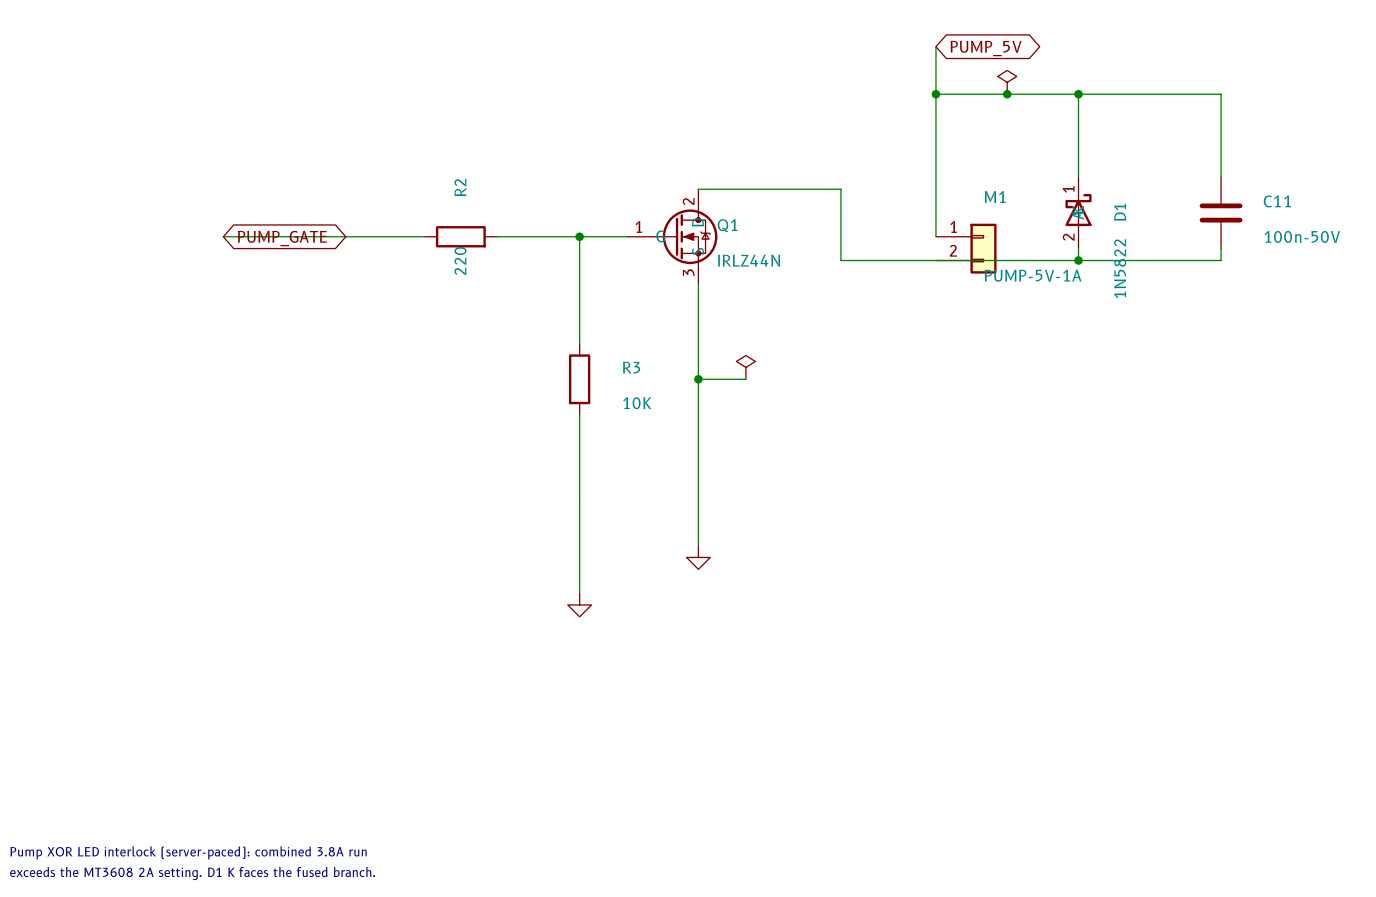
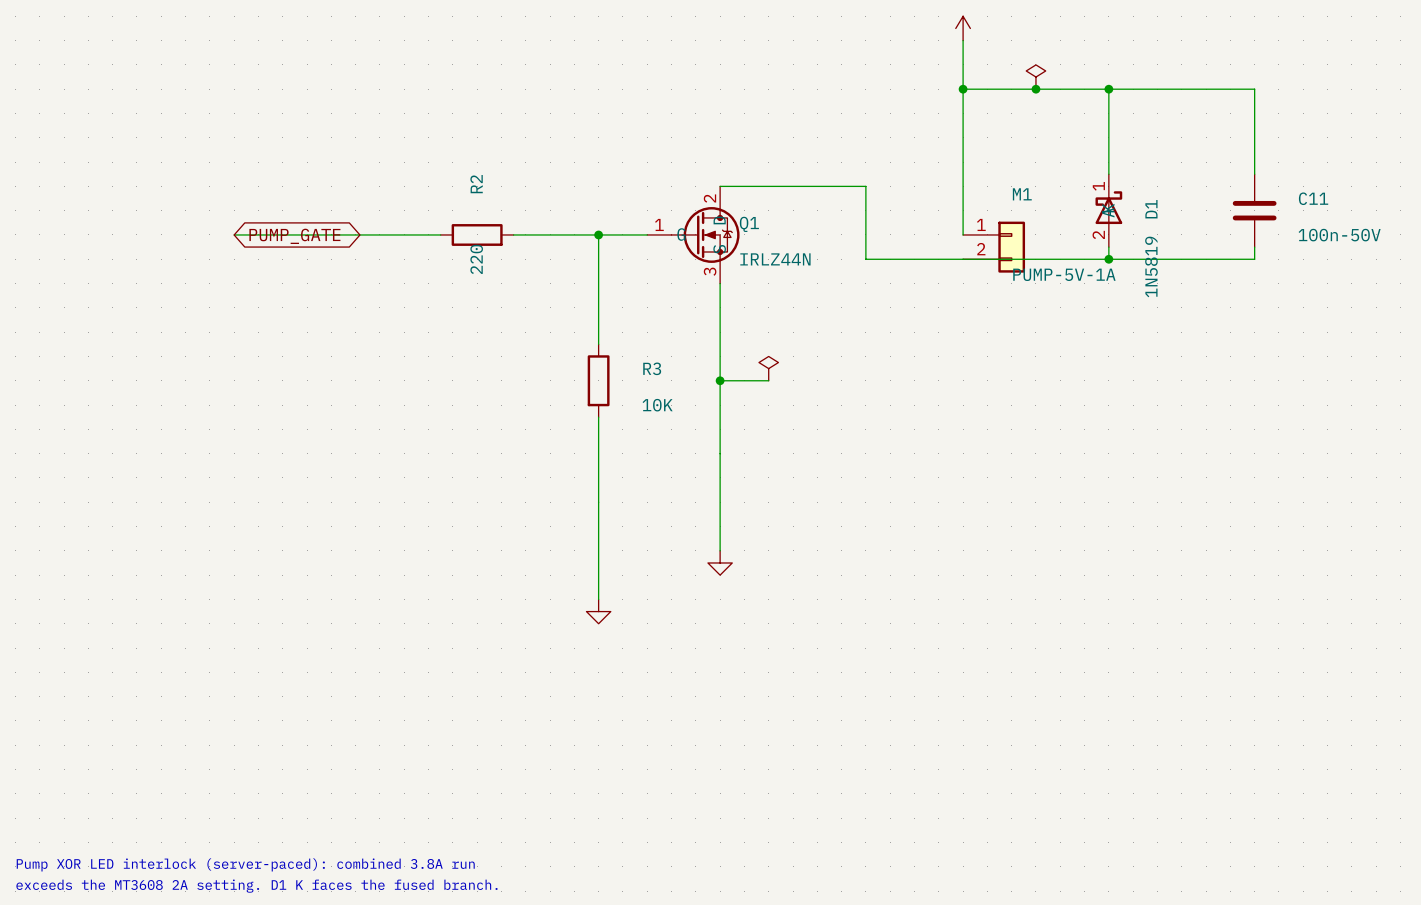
power symbol: none -> (963, 28)
global label: PUMP_5V (986, 48) -> none
D1 value: 1N5822 (1120, 268) -> 1N5819 (1151, 266)

